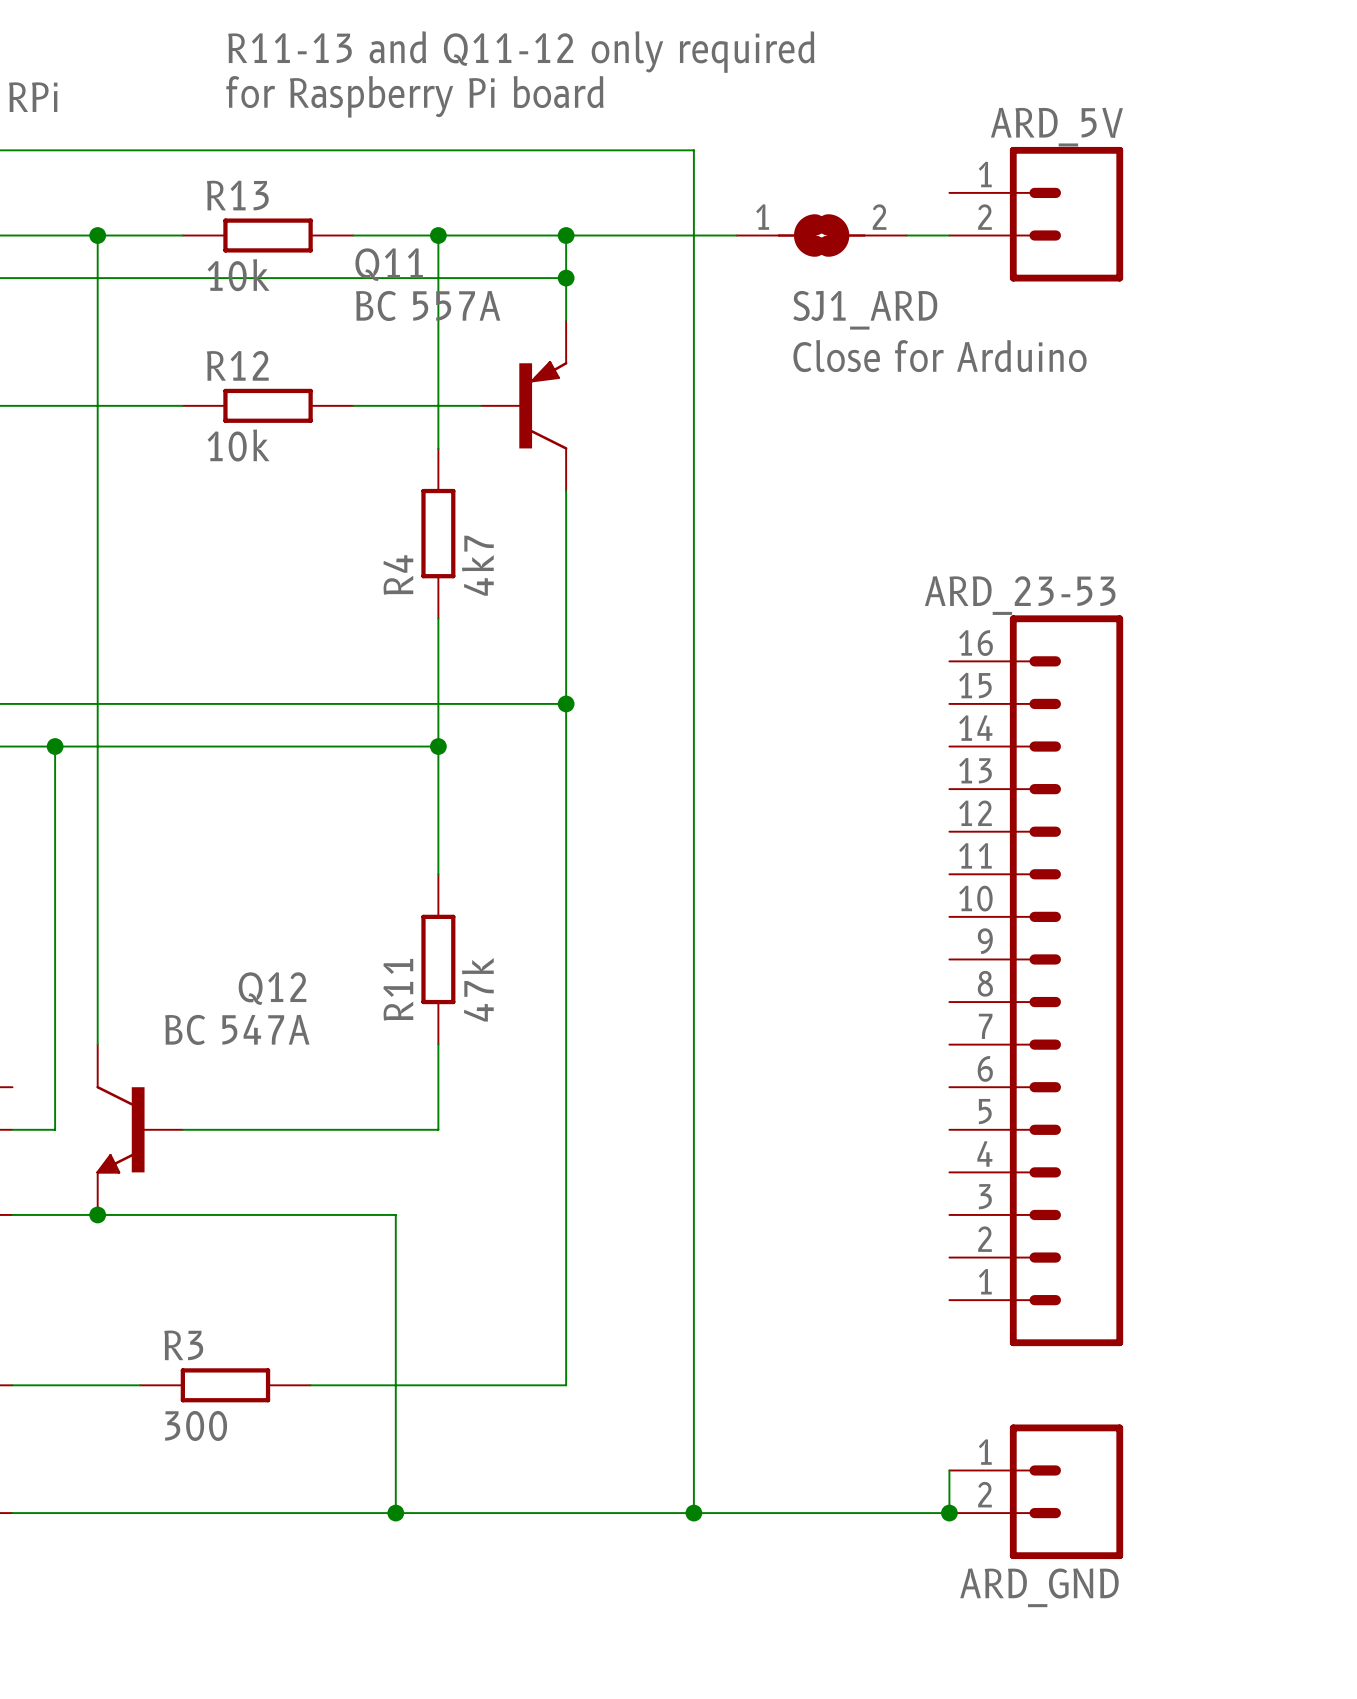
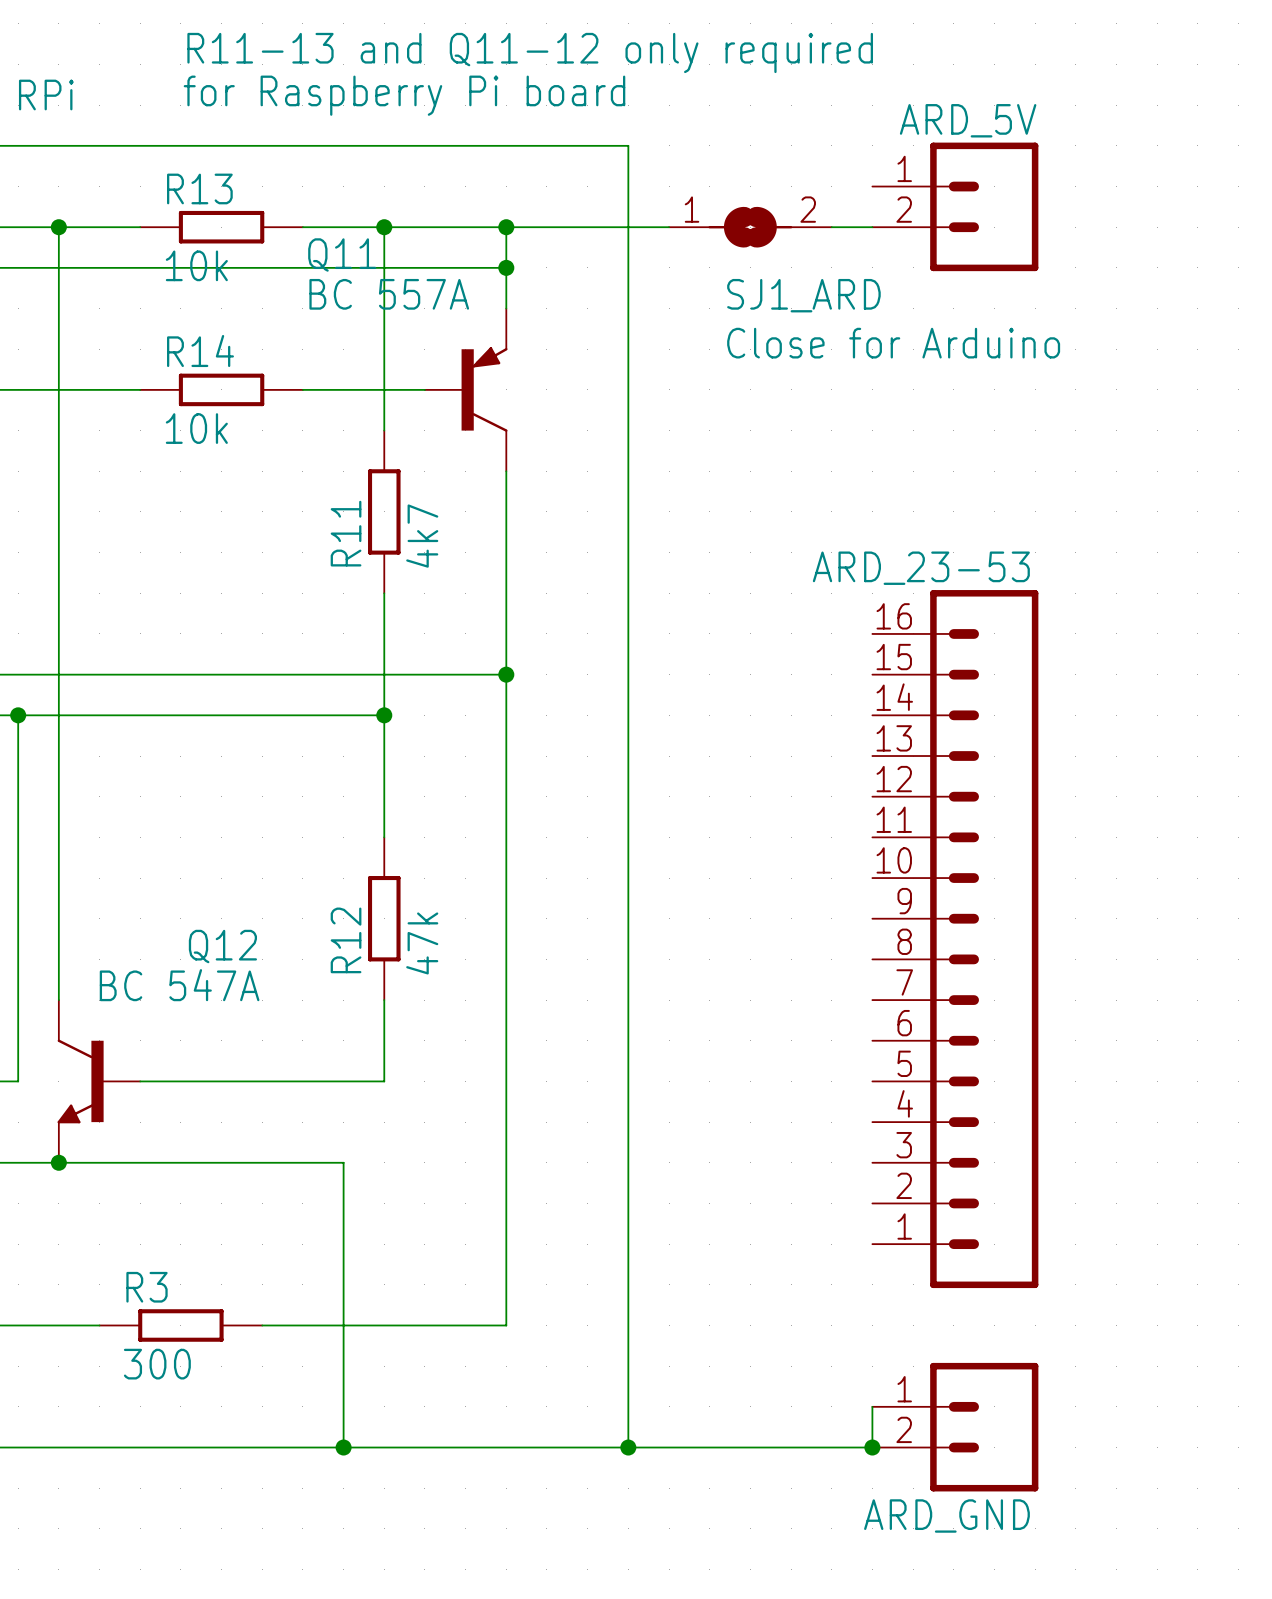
R12 name: R12 (237, 365) -> R14 (200, 351)
R4 name: R4 (398, 574) -> R11 (346, 533)
R11 name: R11 (398, 989) -> R12 (346, 940)

